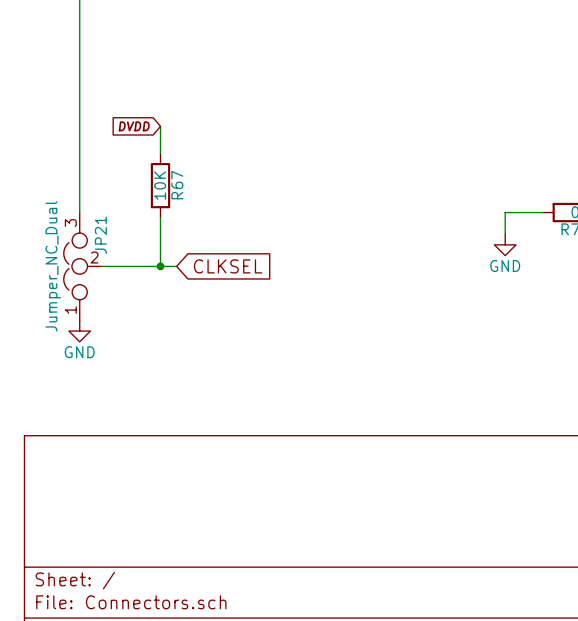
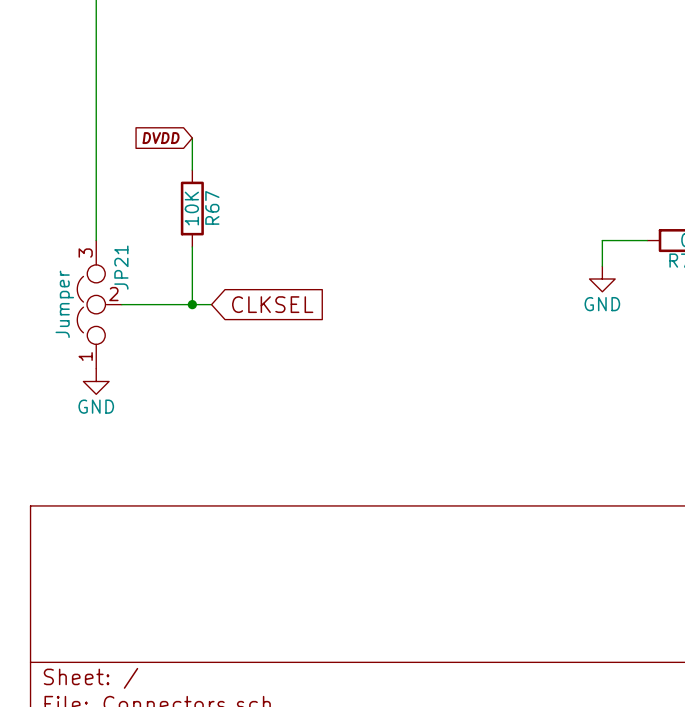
JP21 value: Jumper_NC_Dual (53, 266) -> Jumper (64, 304)

